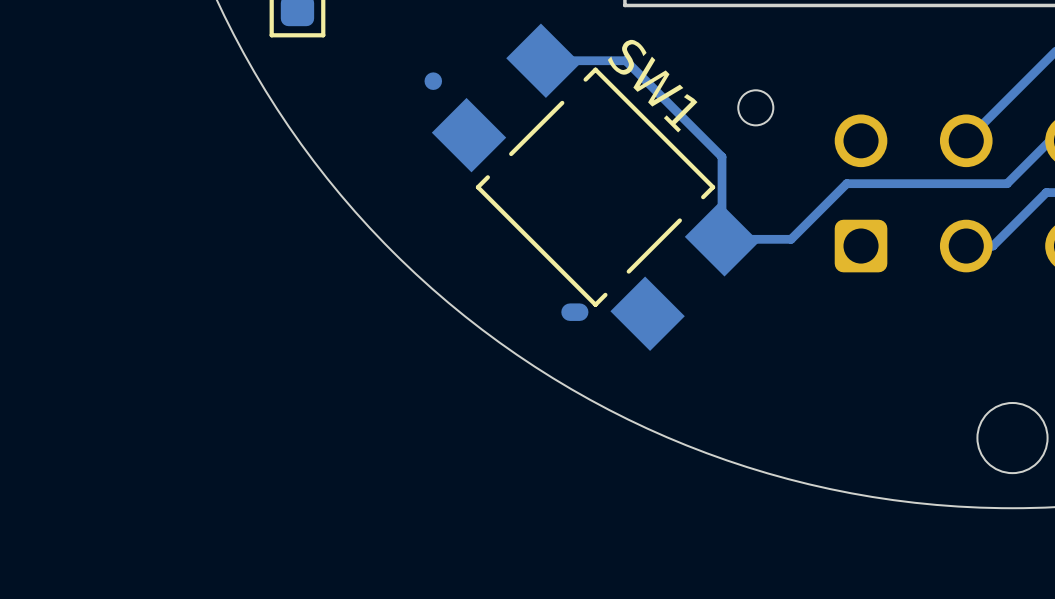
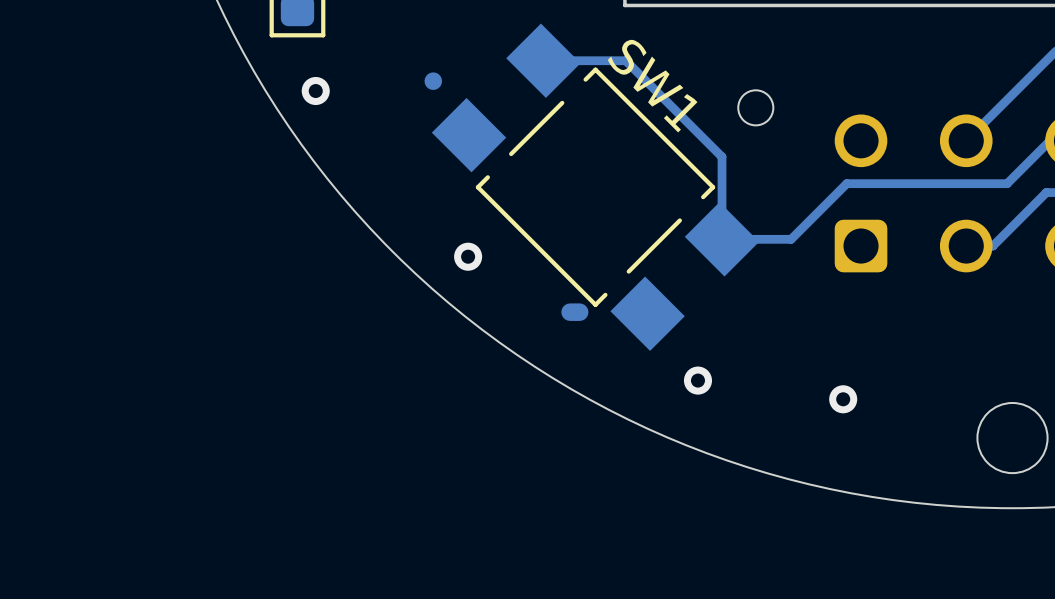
via: none -> (315, 91)
via: none -> (468, 256)
via: none -> (697, 380)
via: none -> (843, 399)

